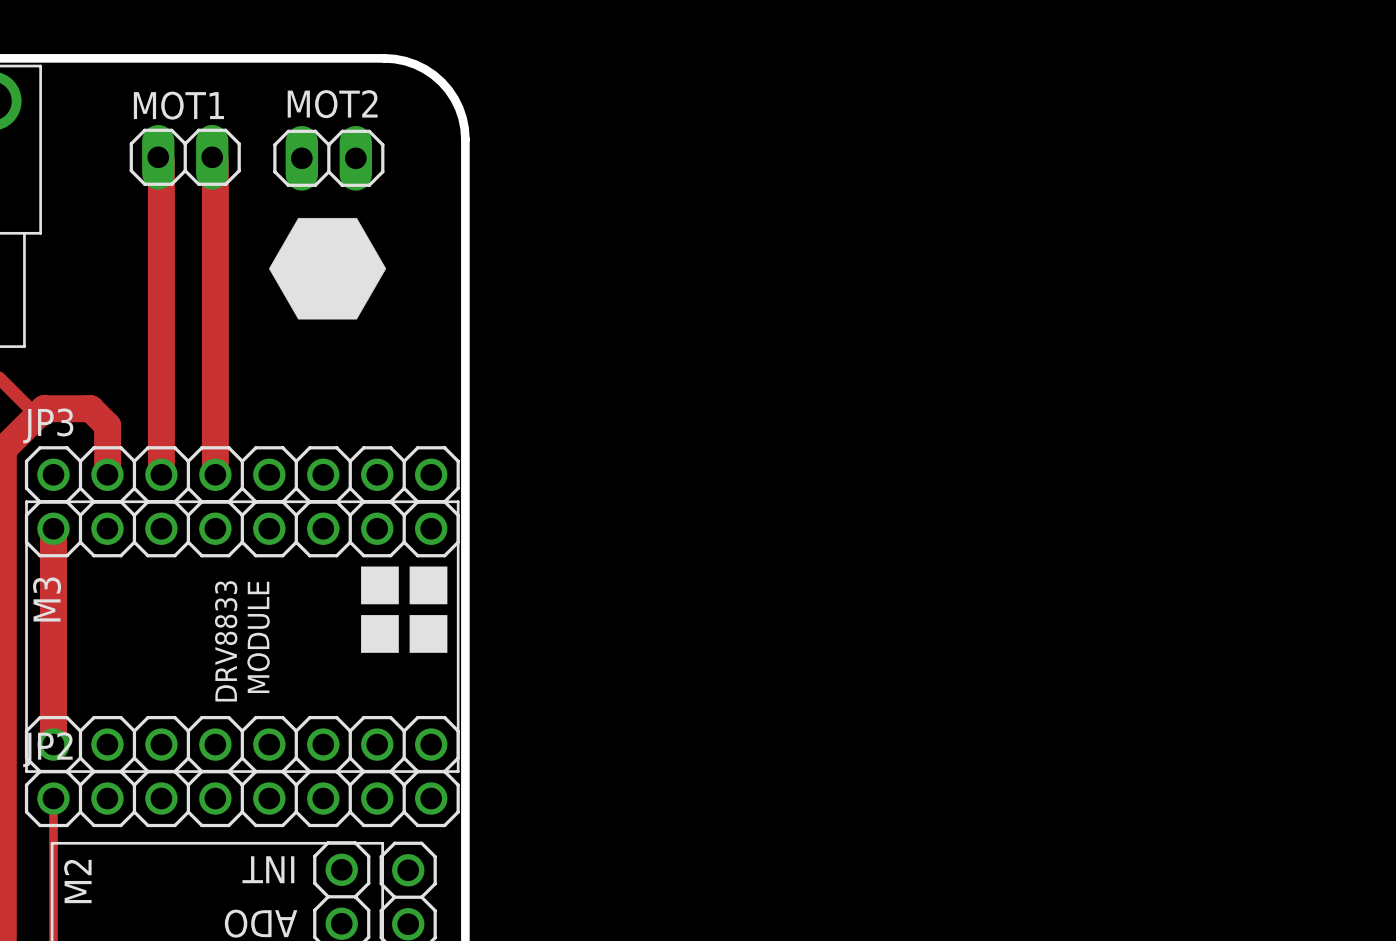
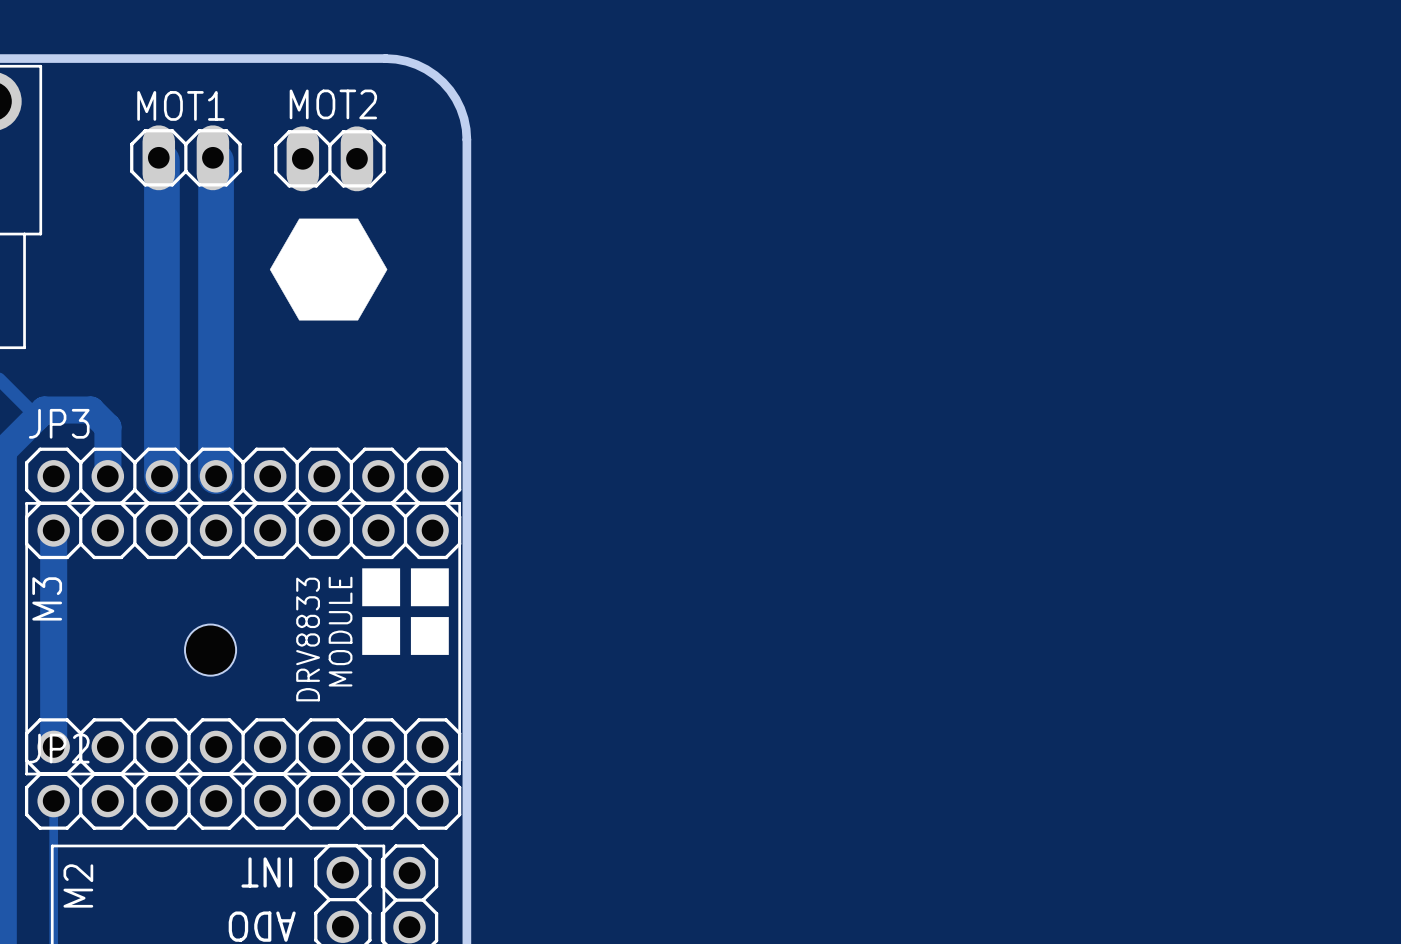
track width: thin (161, 160) (161, 474) -> thick (161, 160) (161, 476)
track width: thin (215, 160) (215, 474) -> thick (216, 160) (216, 476)
M3 text position: MODULE (258, 637) -> MODULE (340, 631)
M3 text position: DRV8833 (226, 641) -> DRV8833 (308, 639)
hole: none -> (210, 650)

